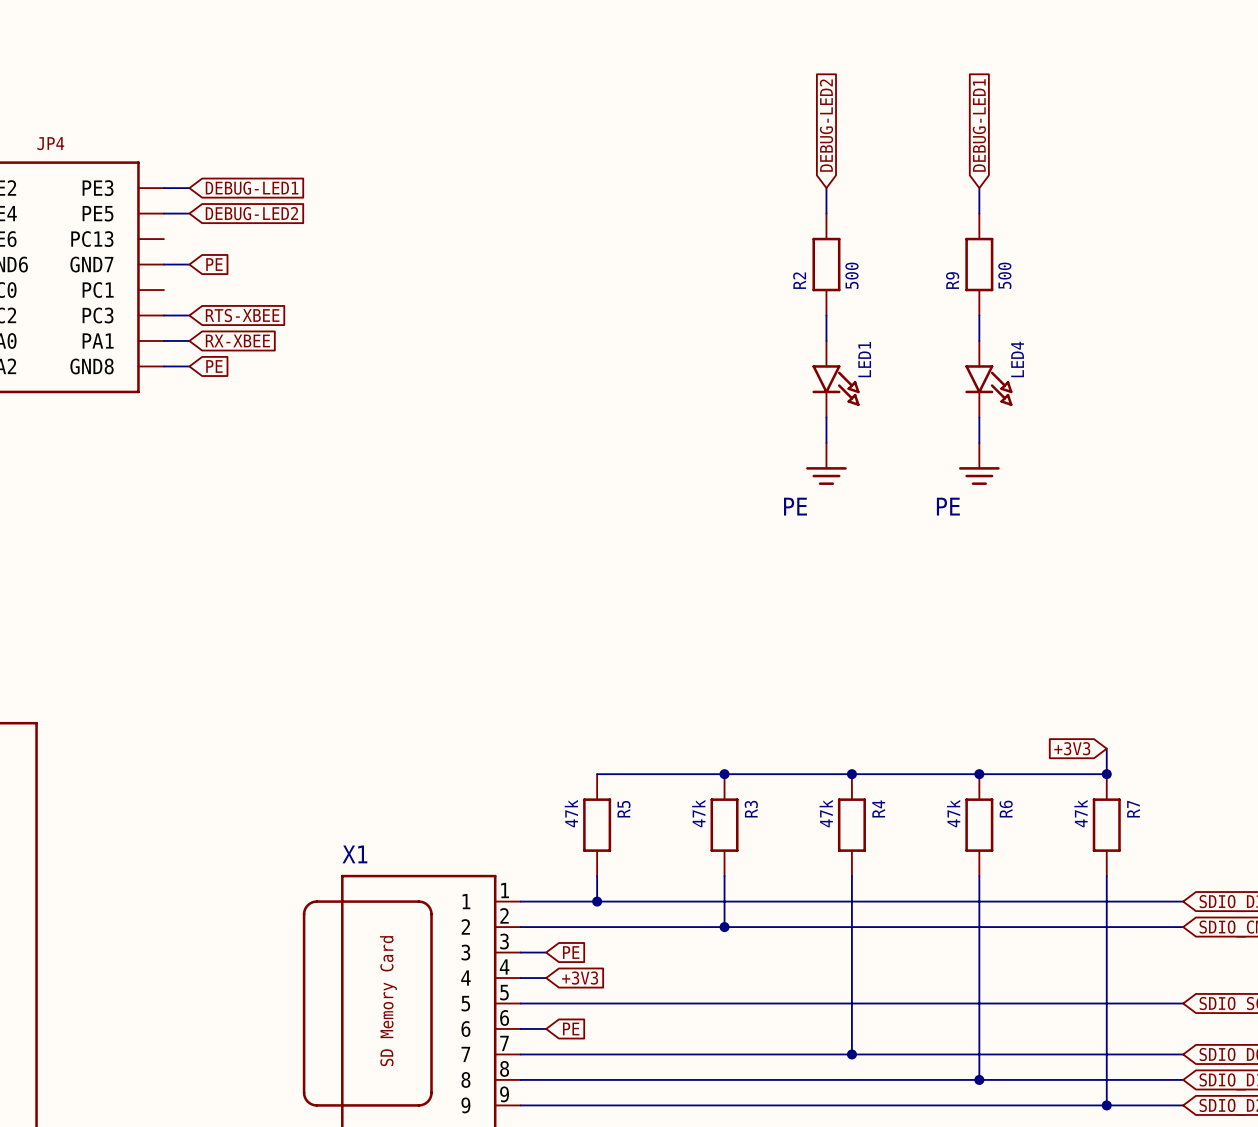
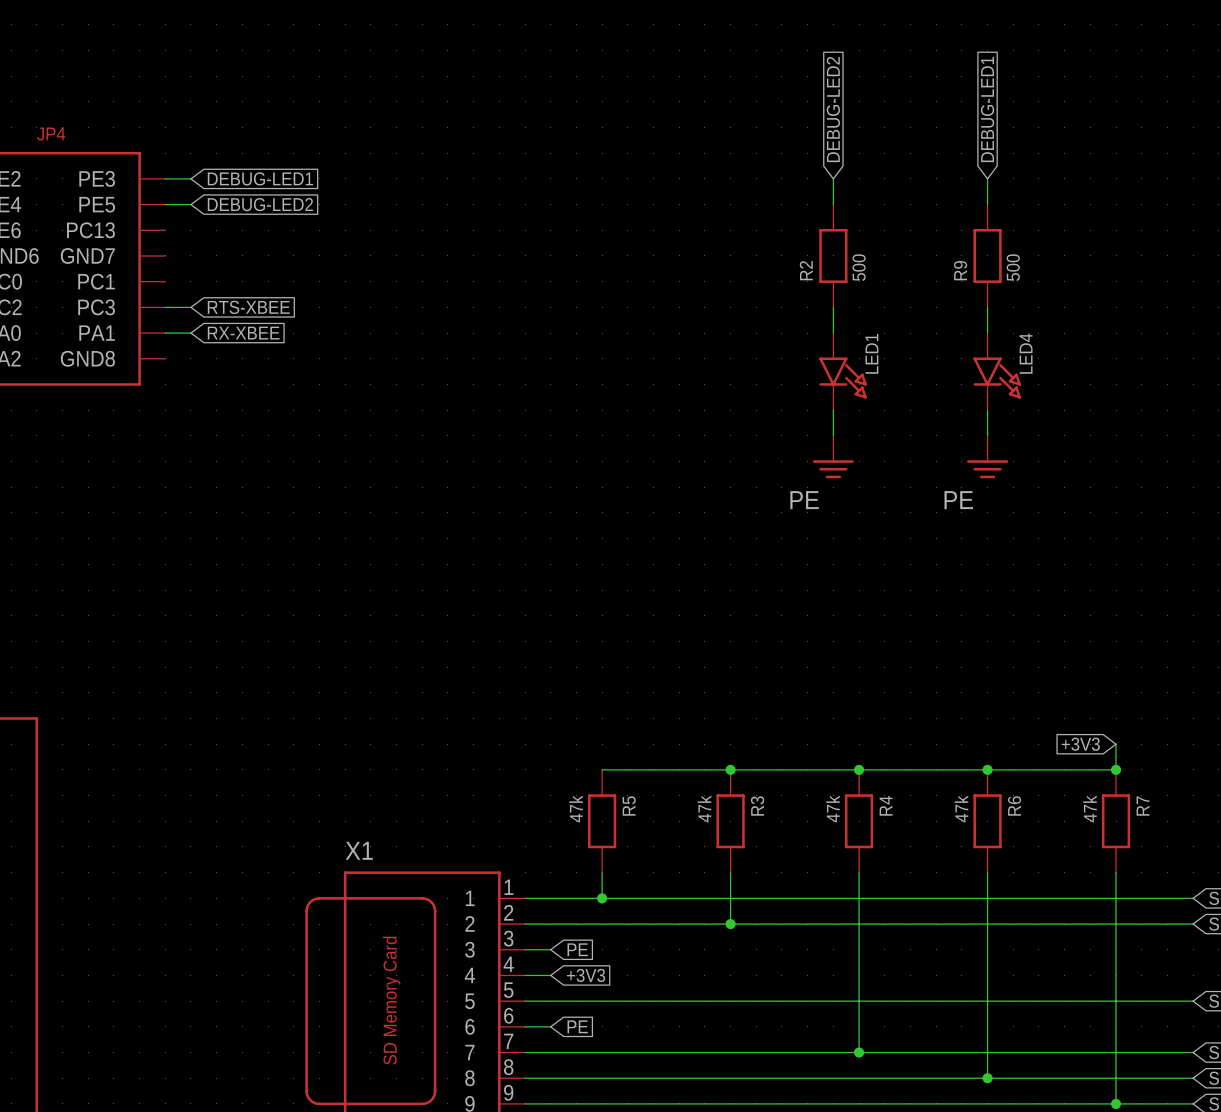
wire: (163, 264) (189, 264) -> none
global label: PE (214, 264) -> none
wire: (163, 366) (189, 366) -> none
global label: PE (214, 366) -> none

